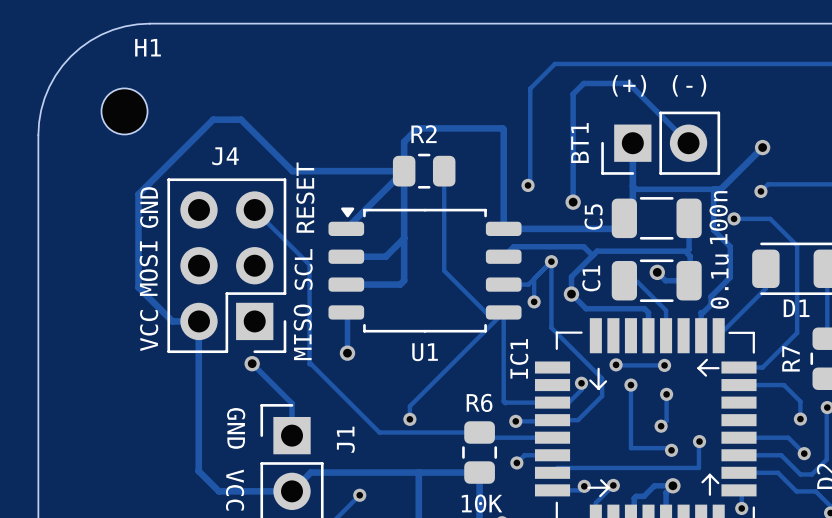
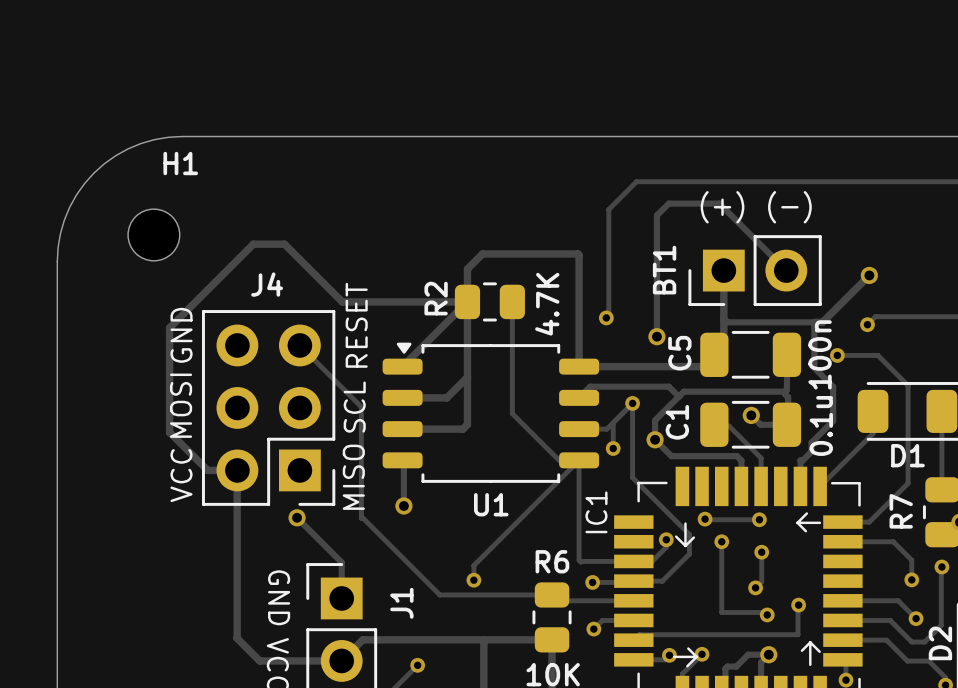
R2 name rotation: 0° (424, 134) -> 90° counterclockwise (436, 298)
R2 name position: R2 (424, 134) -> R2 (436, 298)
R2 value: none -> 4.7K (547, 304)

